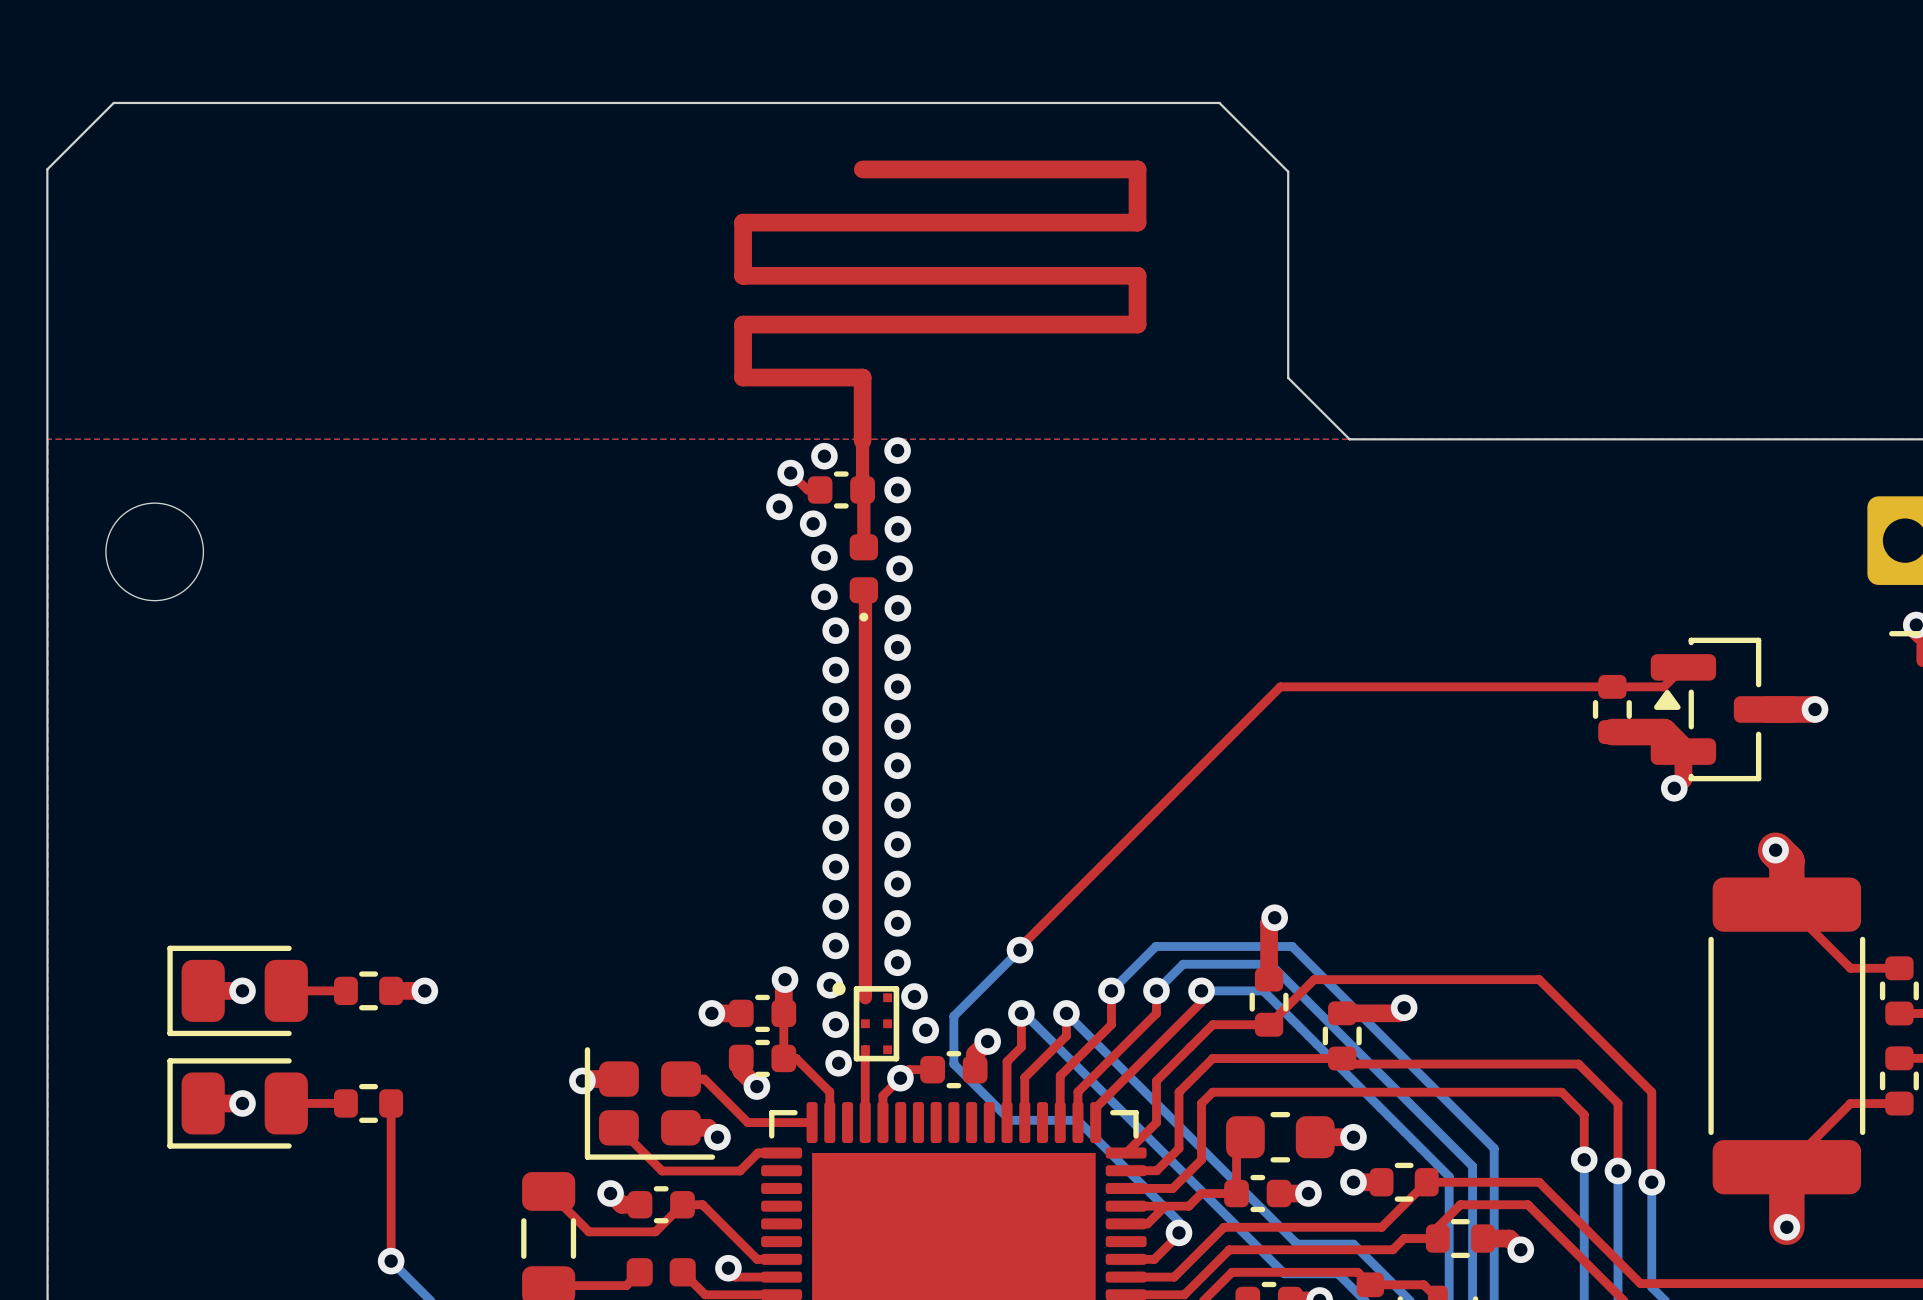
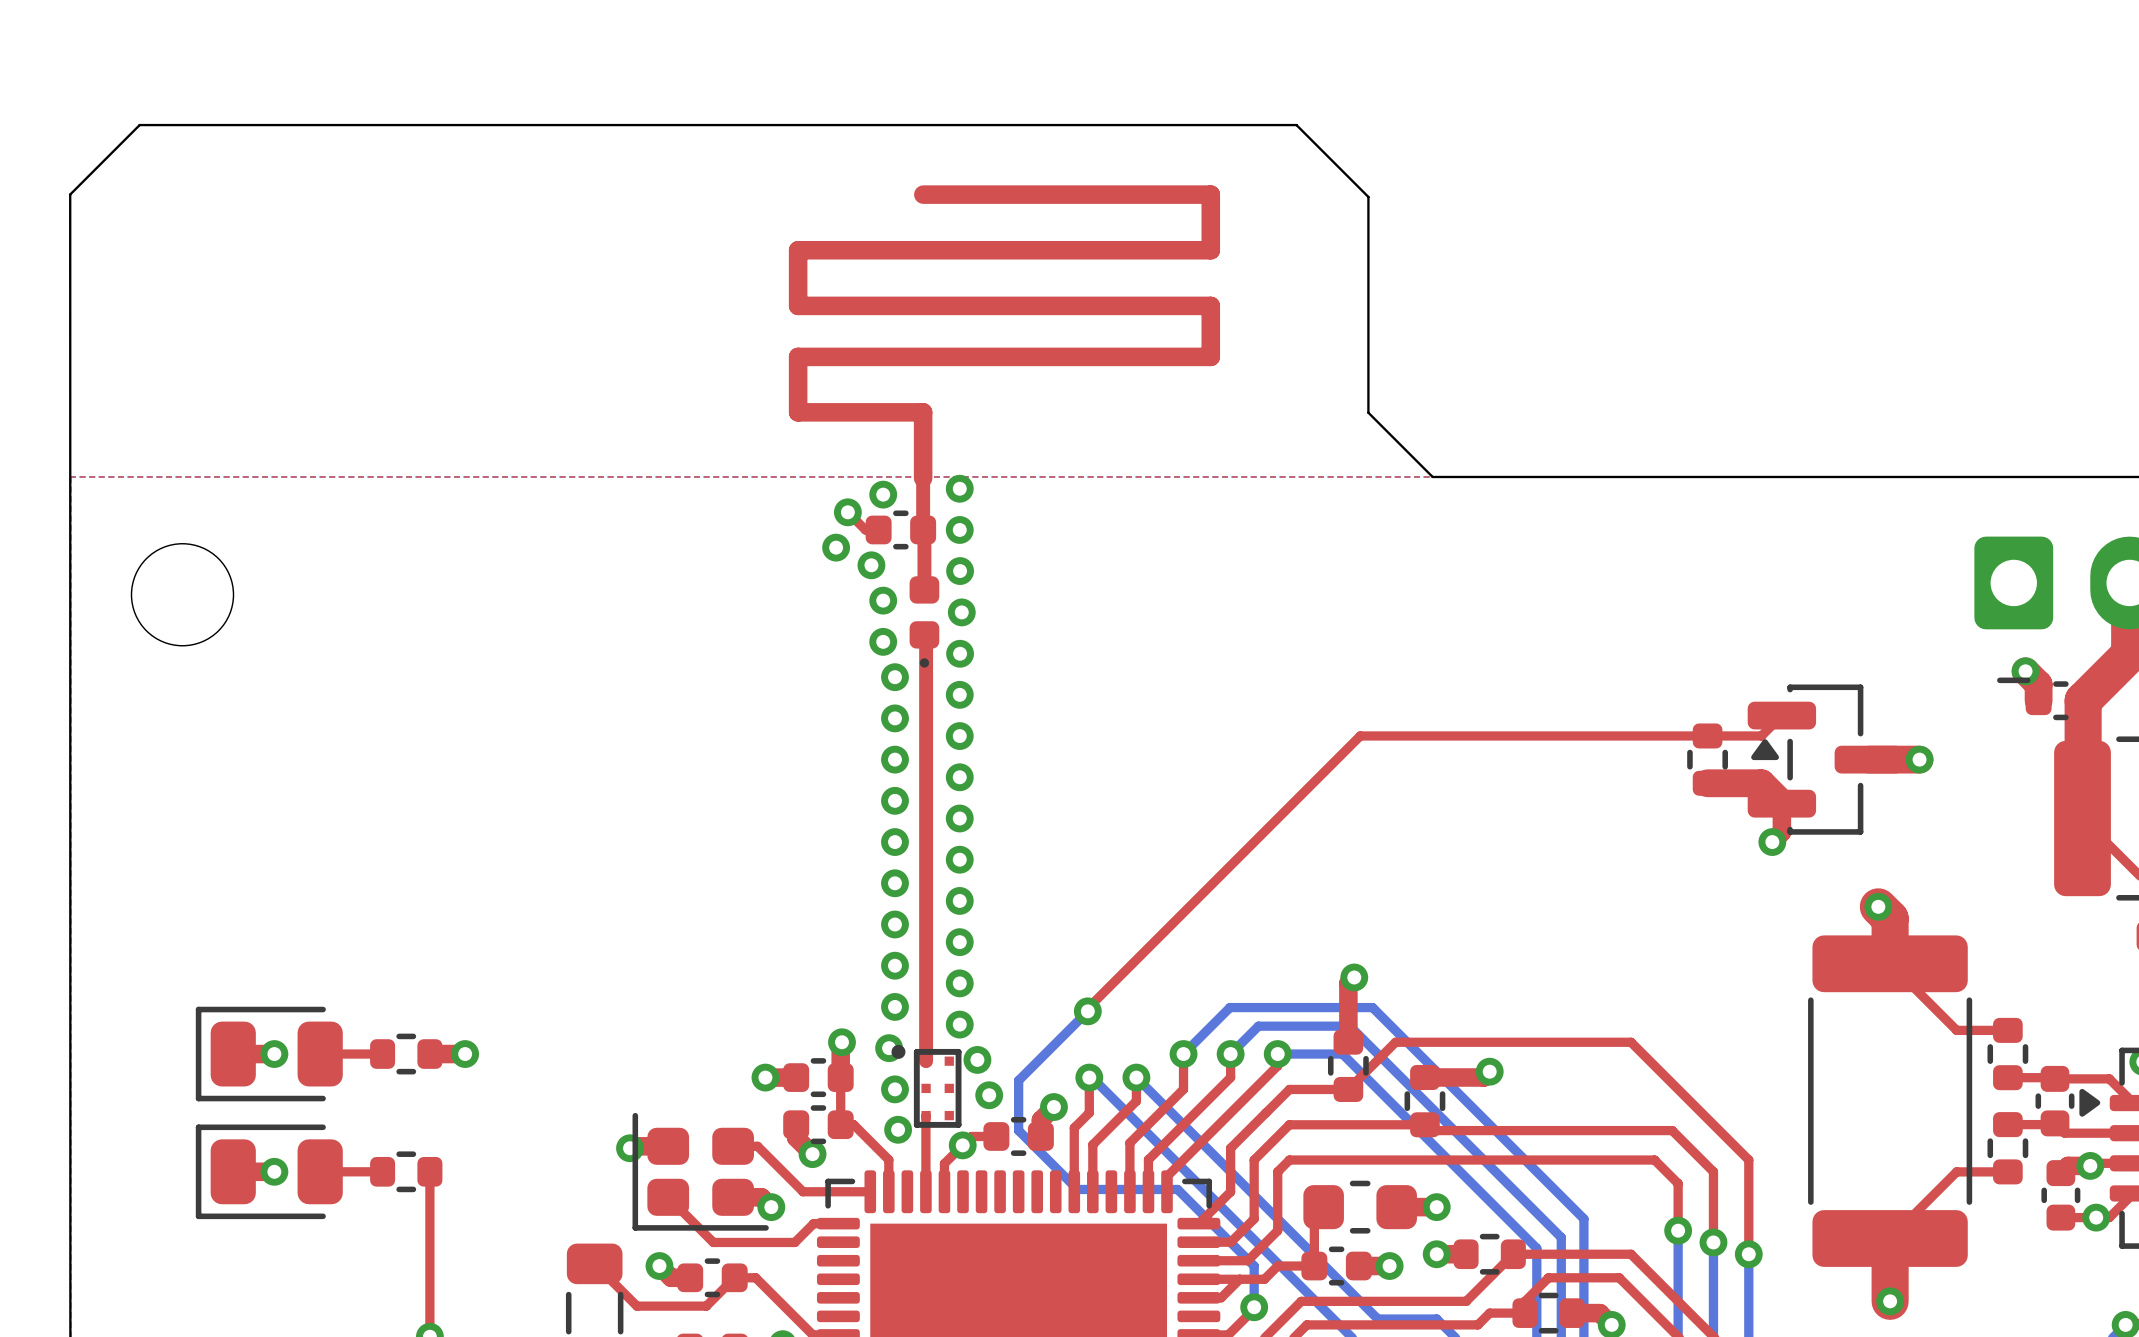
bottom track: (1077, 1120) (1179, 1221) -> (1148, 1189) (1177, 1189) (1254, 1266) (1254, 1295)

